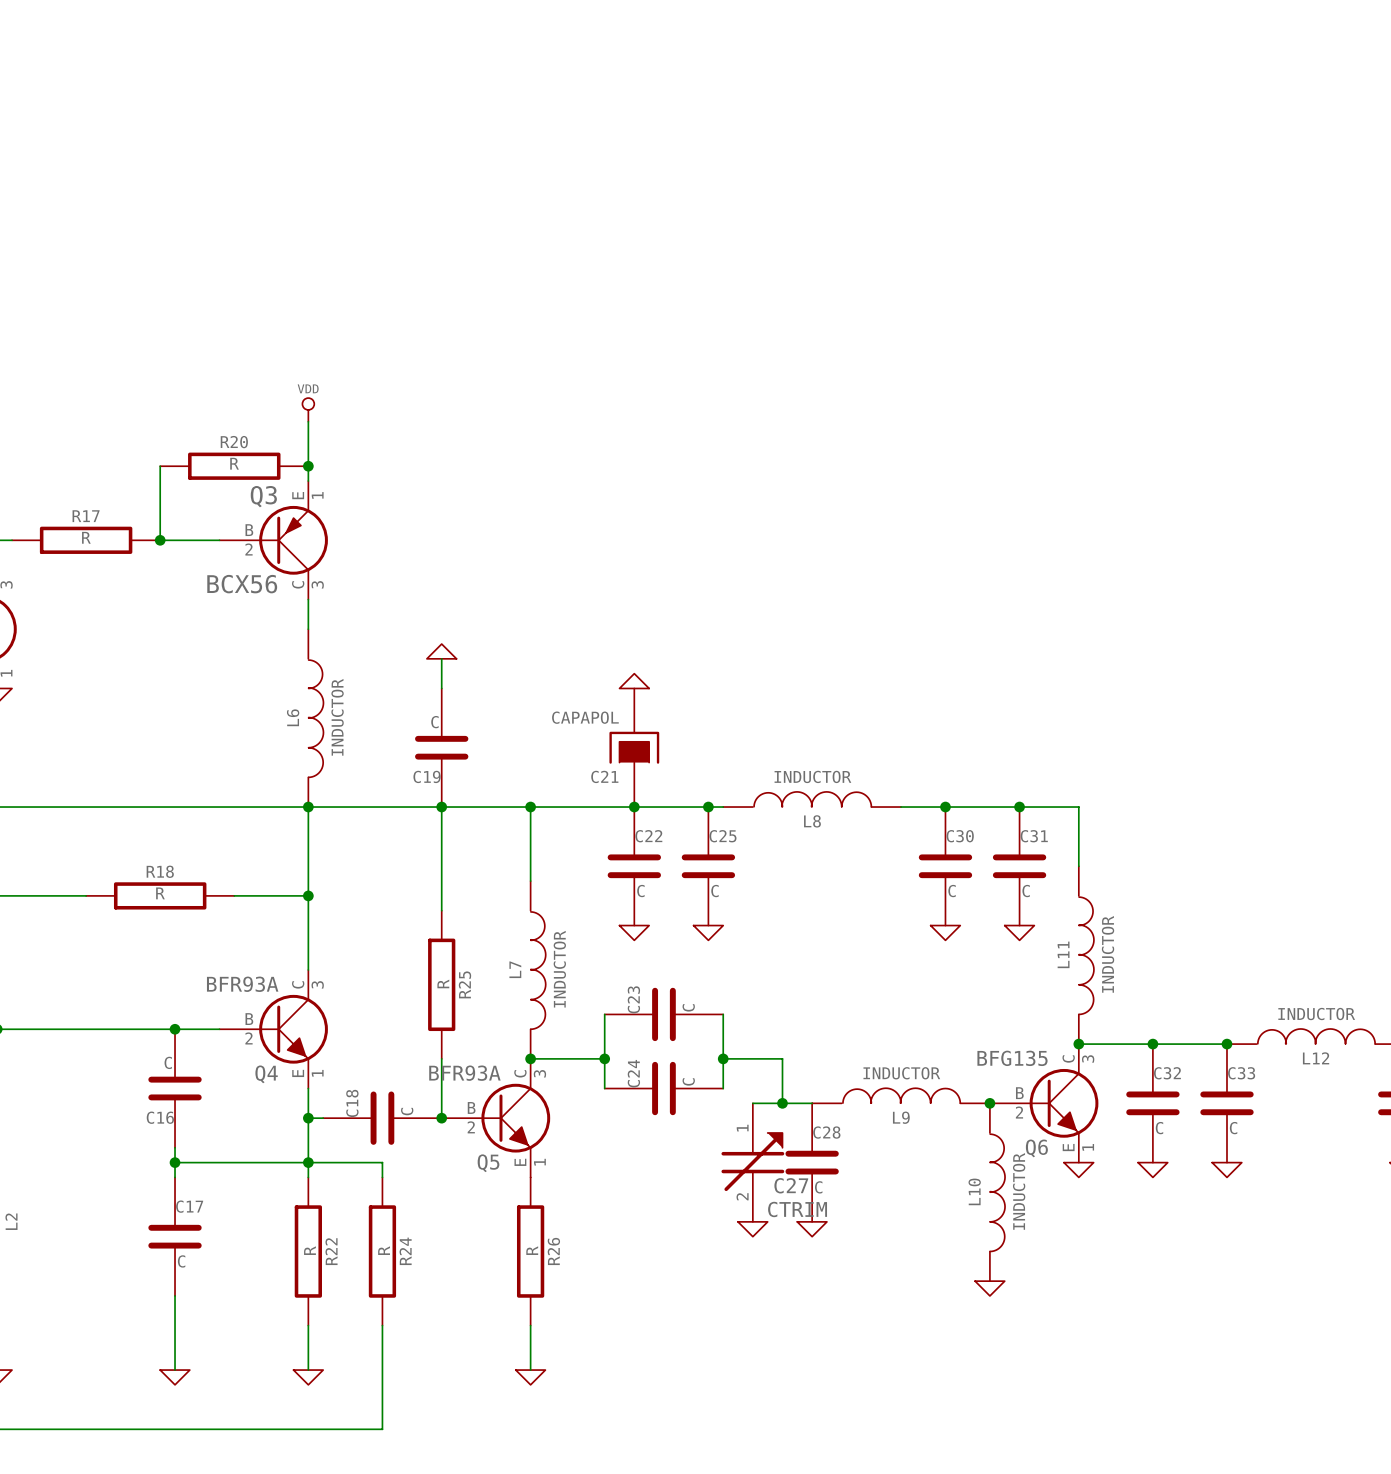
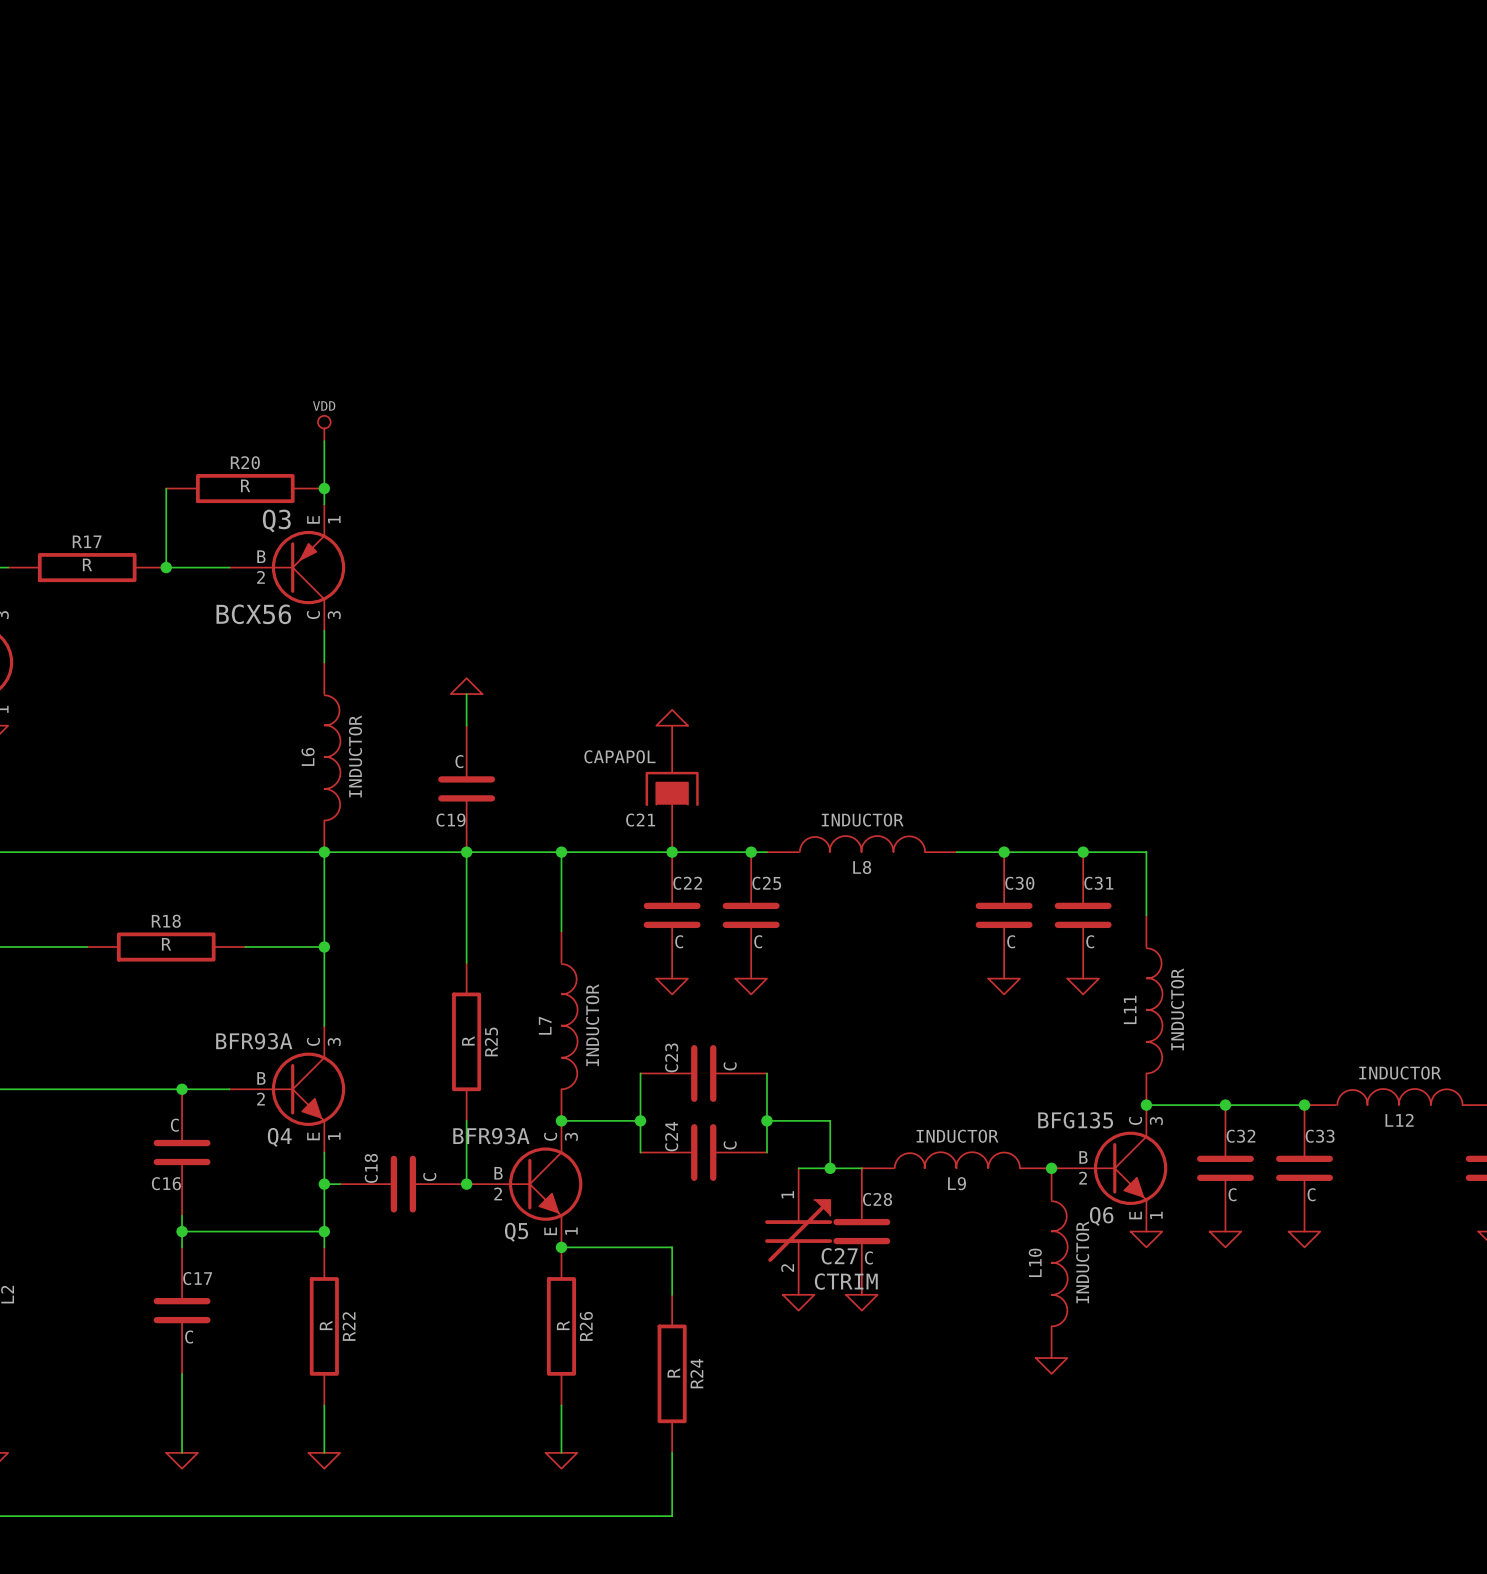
wire: (308, 1162) (382, 1162) (382, 1177) -> none
wire: none -> (561, 1247) (672, 1247) (672, 1294)
junction: none -> (561, 1247)
R24 position: (382, 1251) -> (672, 1373)
wire: (382, 1325) (382, 1429) -> (672, 1452) (672, 1516) (403, 1516)

